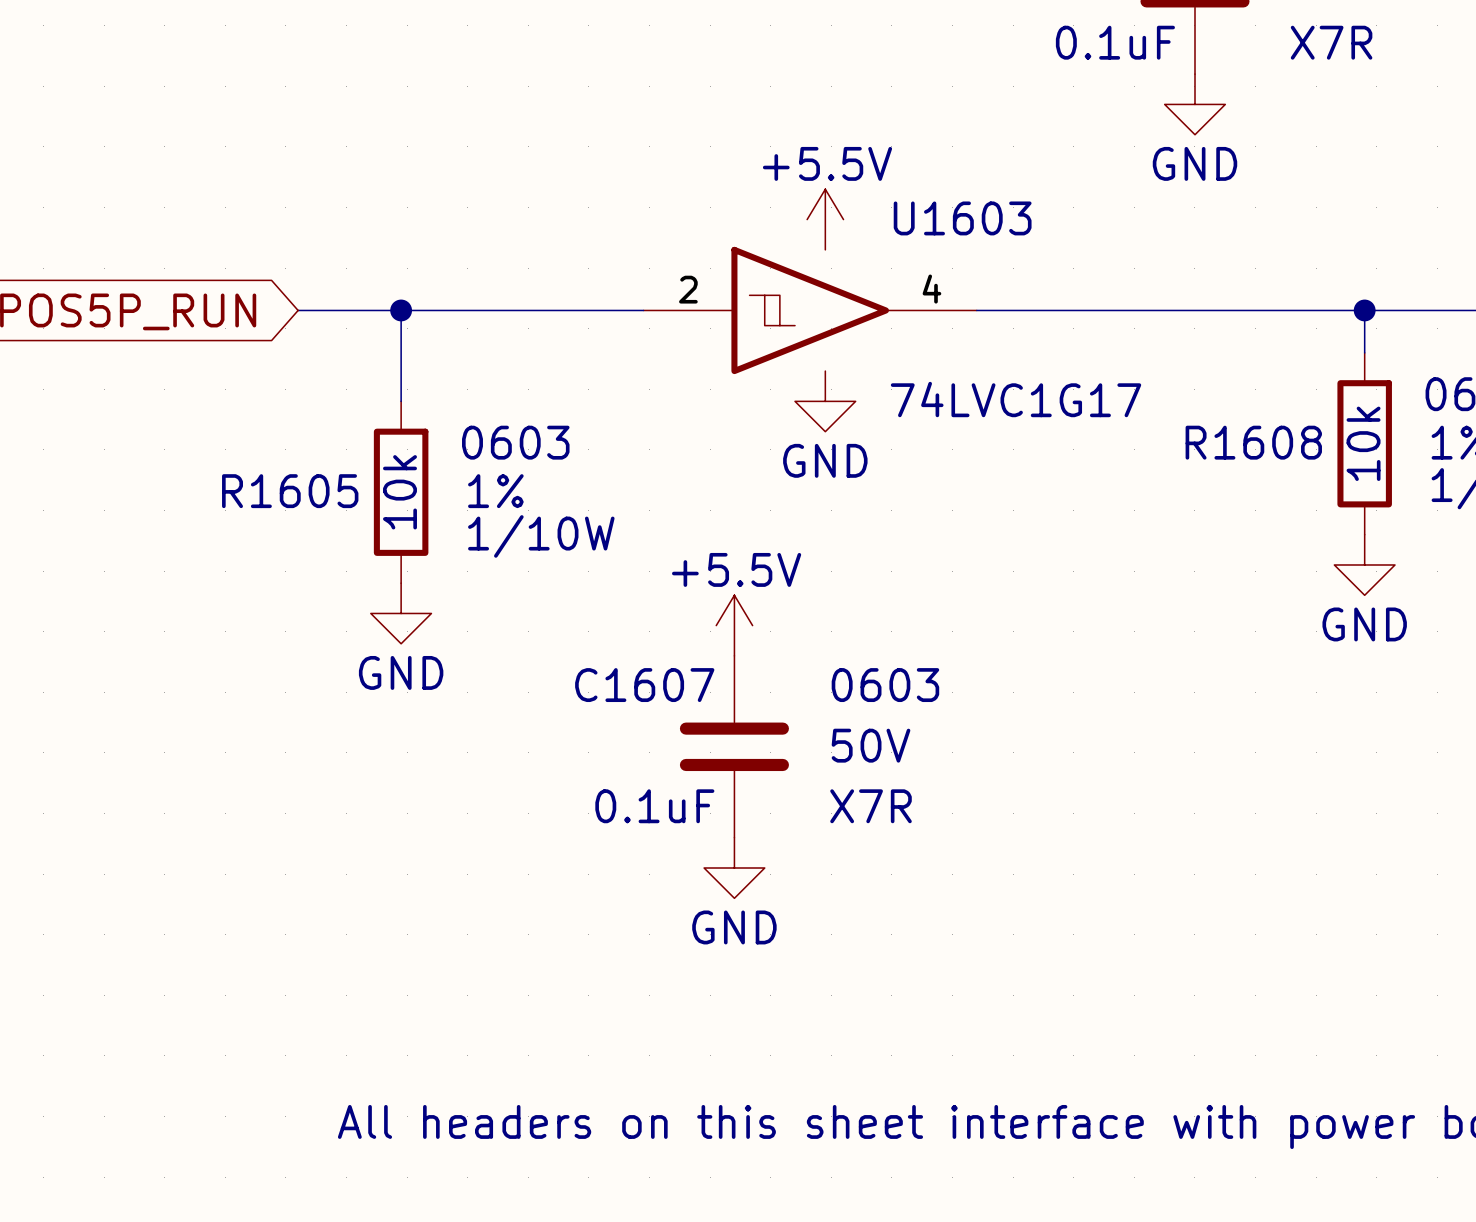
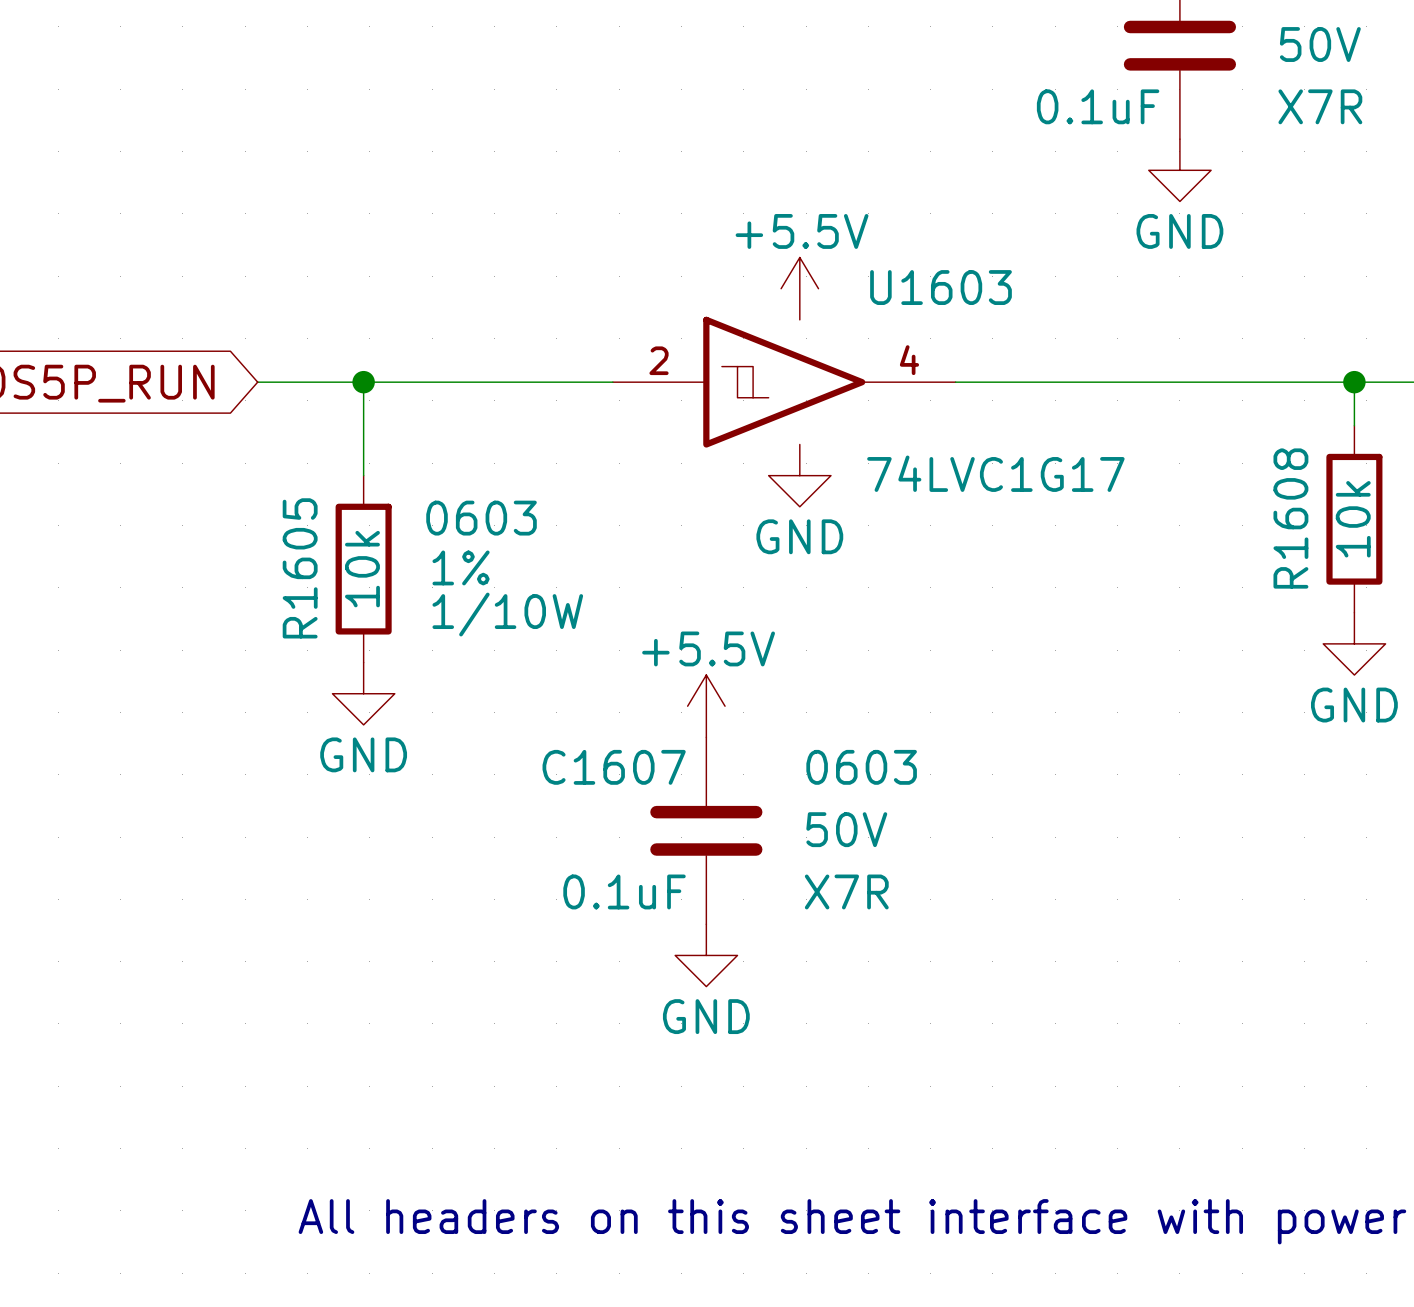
R1608 name rotation: 0° (1253, 442) -> 90° counterclockwise (1290, 518)
R1605 name rotation: 0° (290, 491) -> 90° counterclockwise (300, 568)

